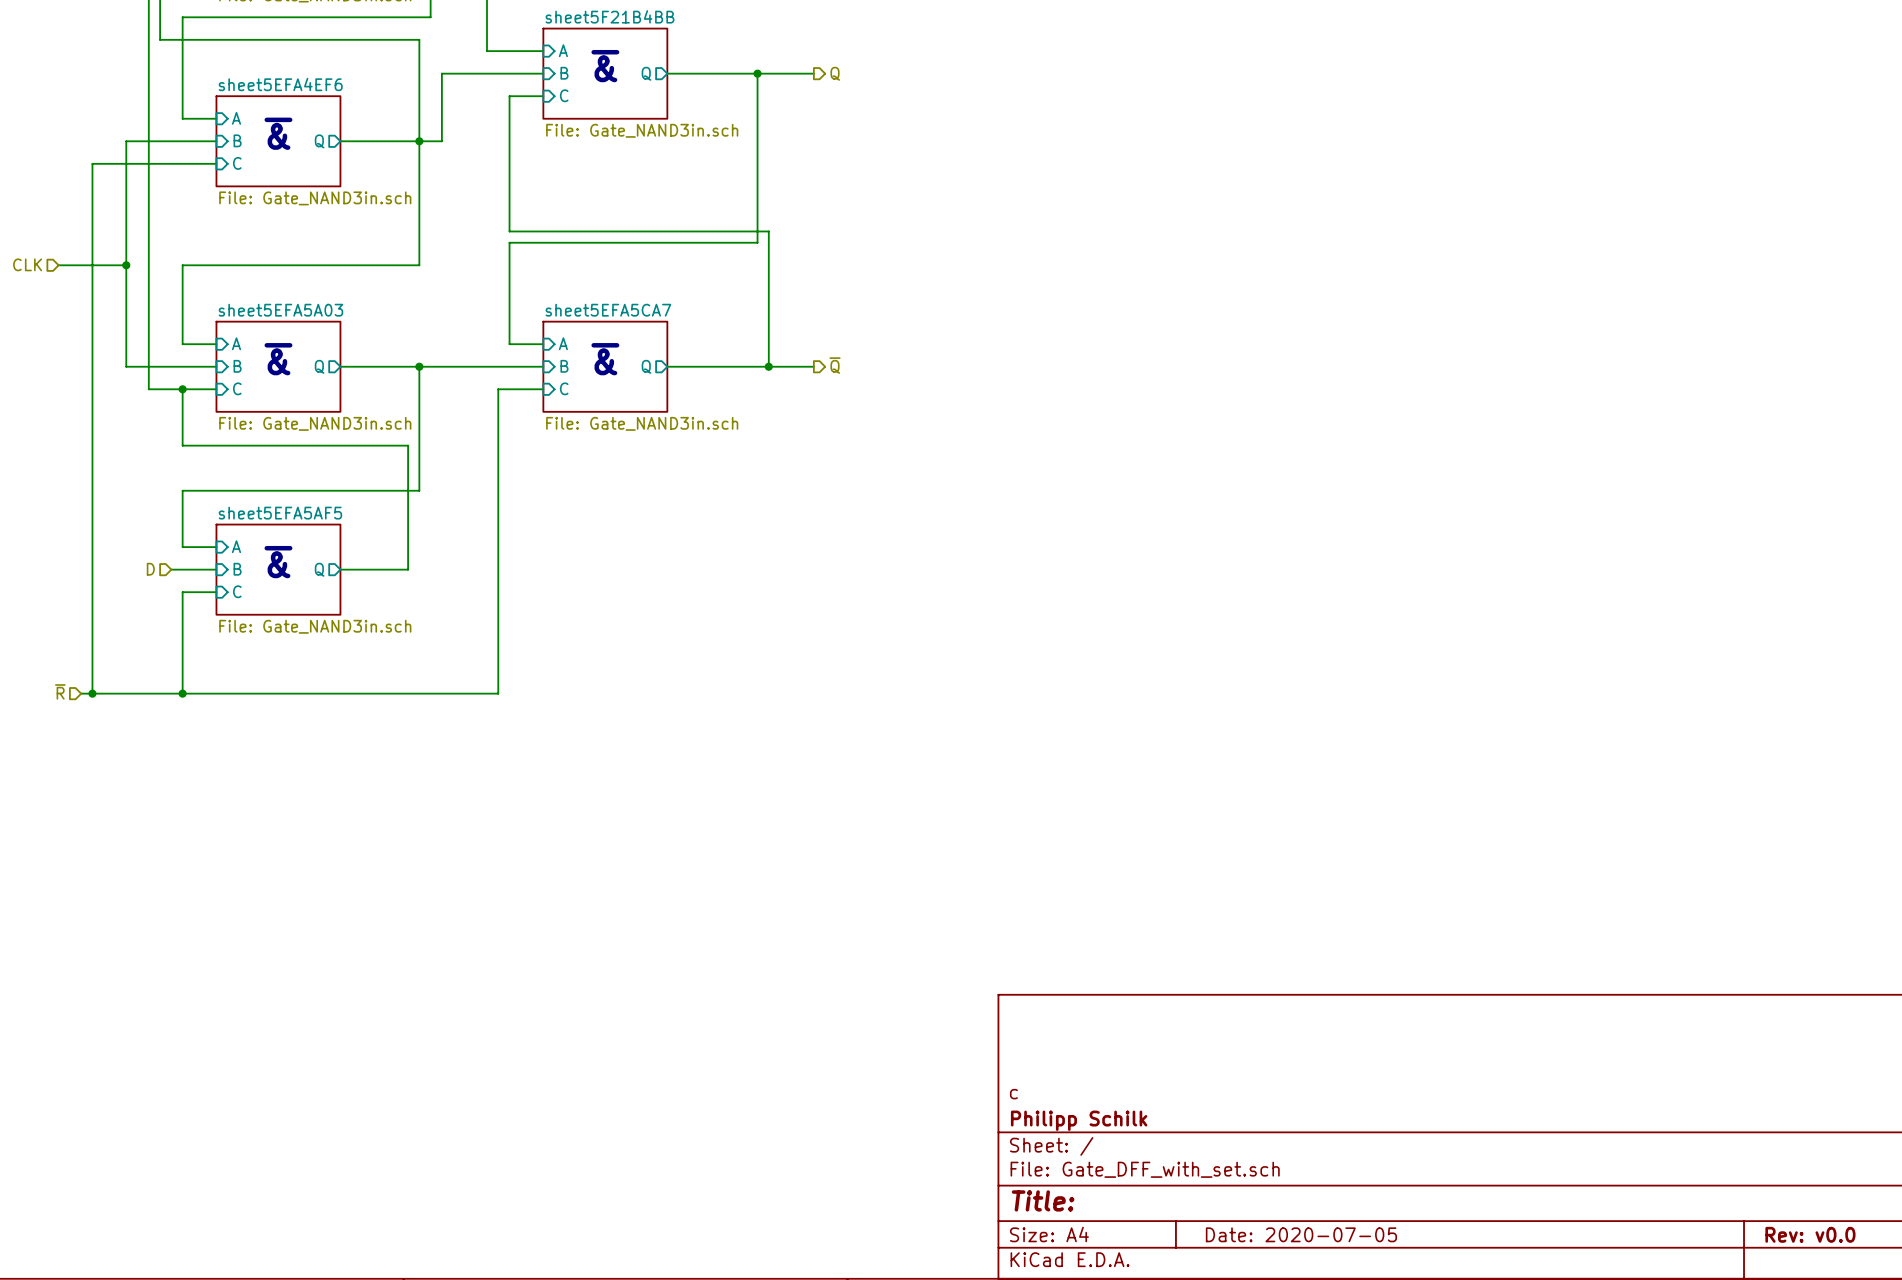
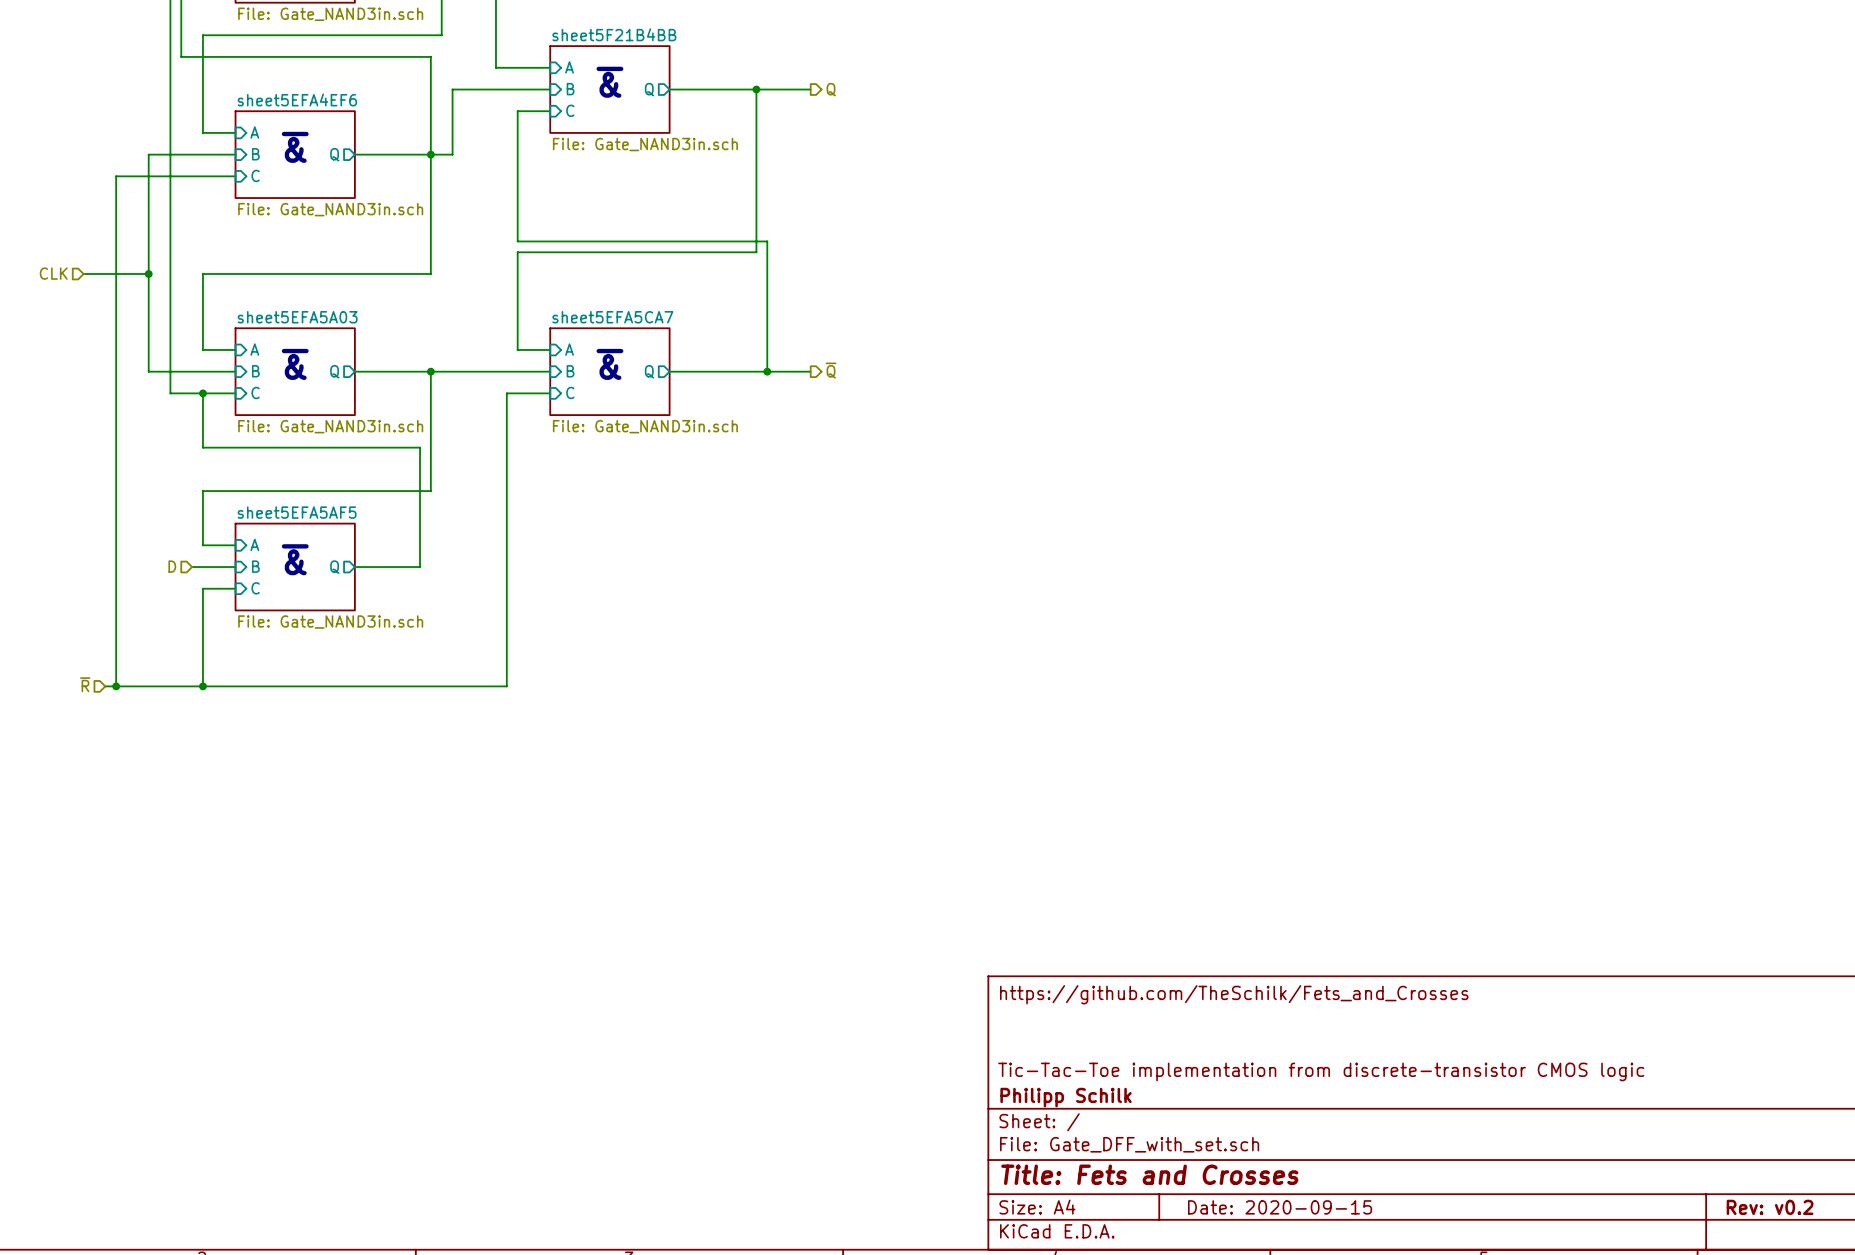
title block: none -> https://github.com/TheSchilk/Fets_and_Crosses (1234, 994)
title block: c (1013, 1094) -> Tic-Tac-Toe implementation from discrete-transistor CMOS logic (1321, 1071)
title block: Title: (1043, 1200) -> Title: Fets and Crosses (1149, 1174)
title block: Date: 2020-07-05 (1301, 1234) -> Date: 2020-09-15 (1280, 1207)
title block: Rev: v0.0 (1810, 1234) -> Rev: v0.2 (1770, 1207)

